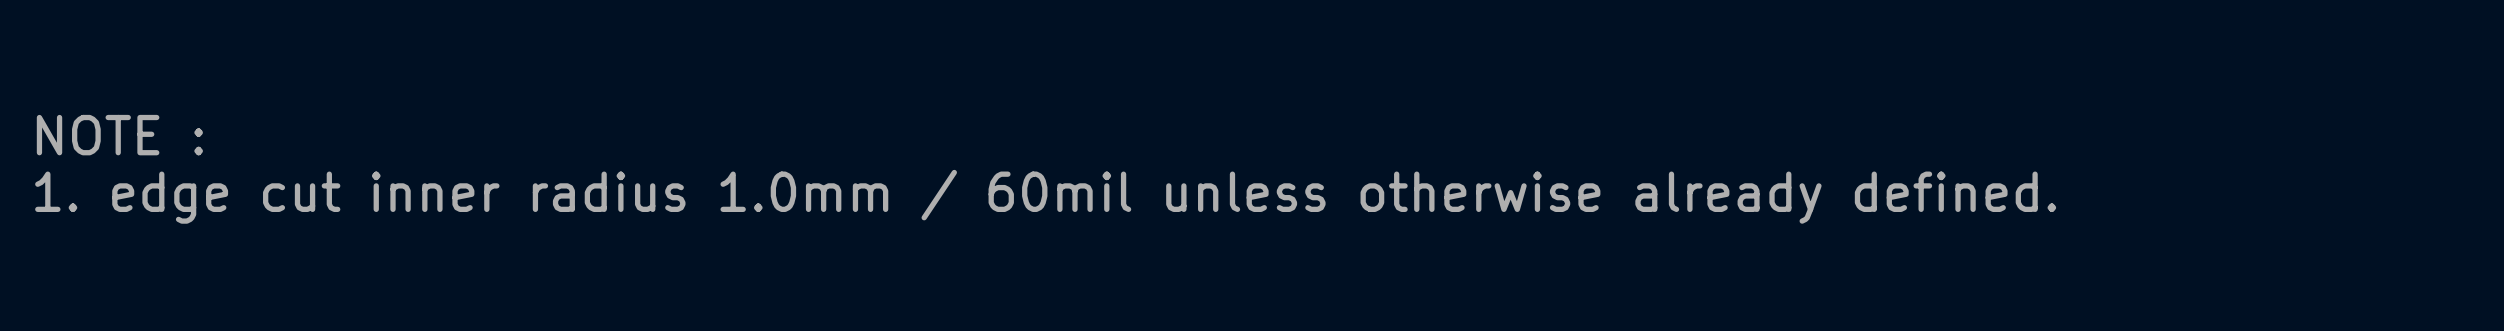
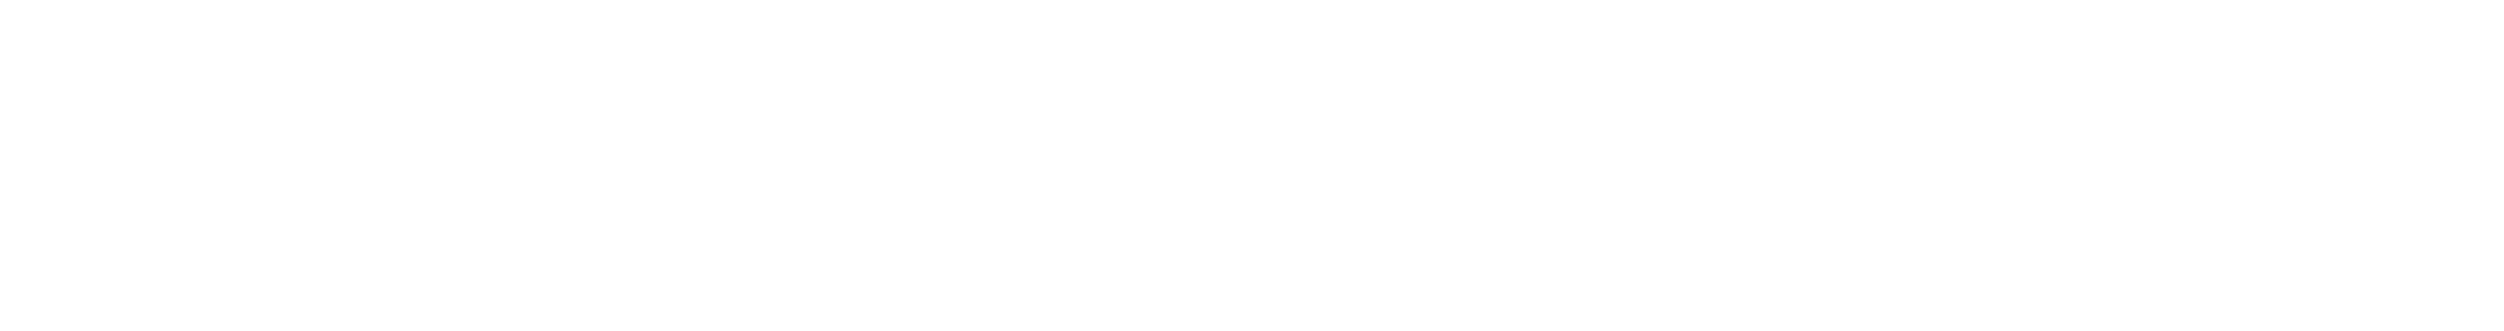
text: NOTE : (119, 135) -> none
text: 1. edge cut inner radius 1.0mm / 60mil unless otherwise already defined. (1045, 196) -> none

